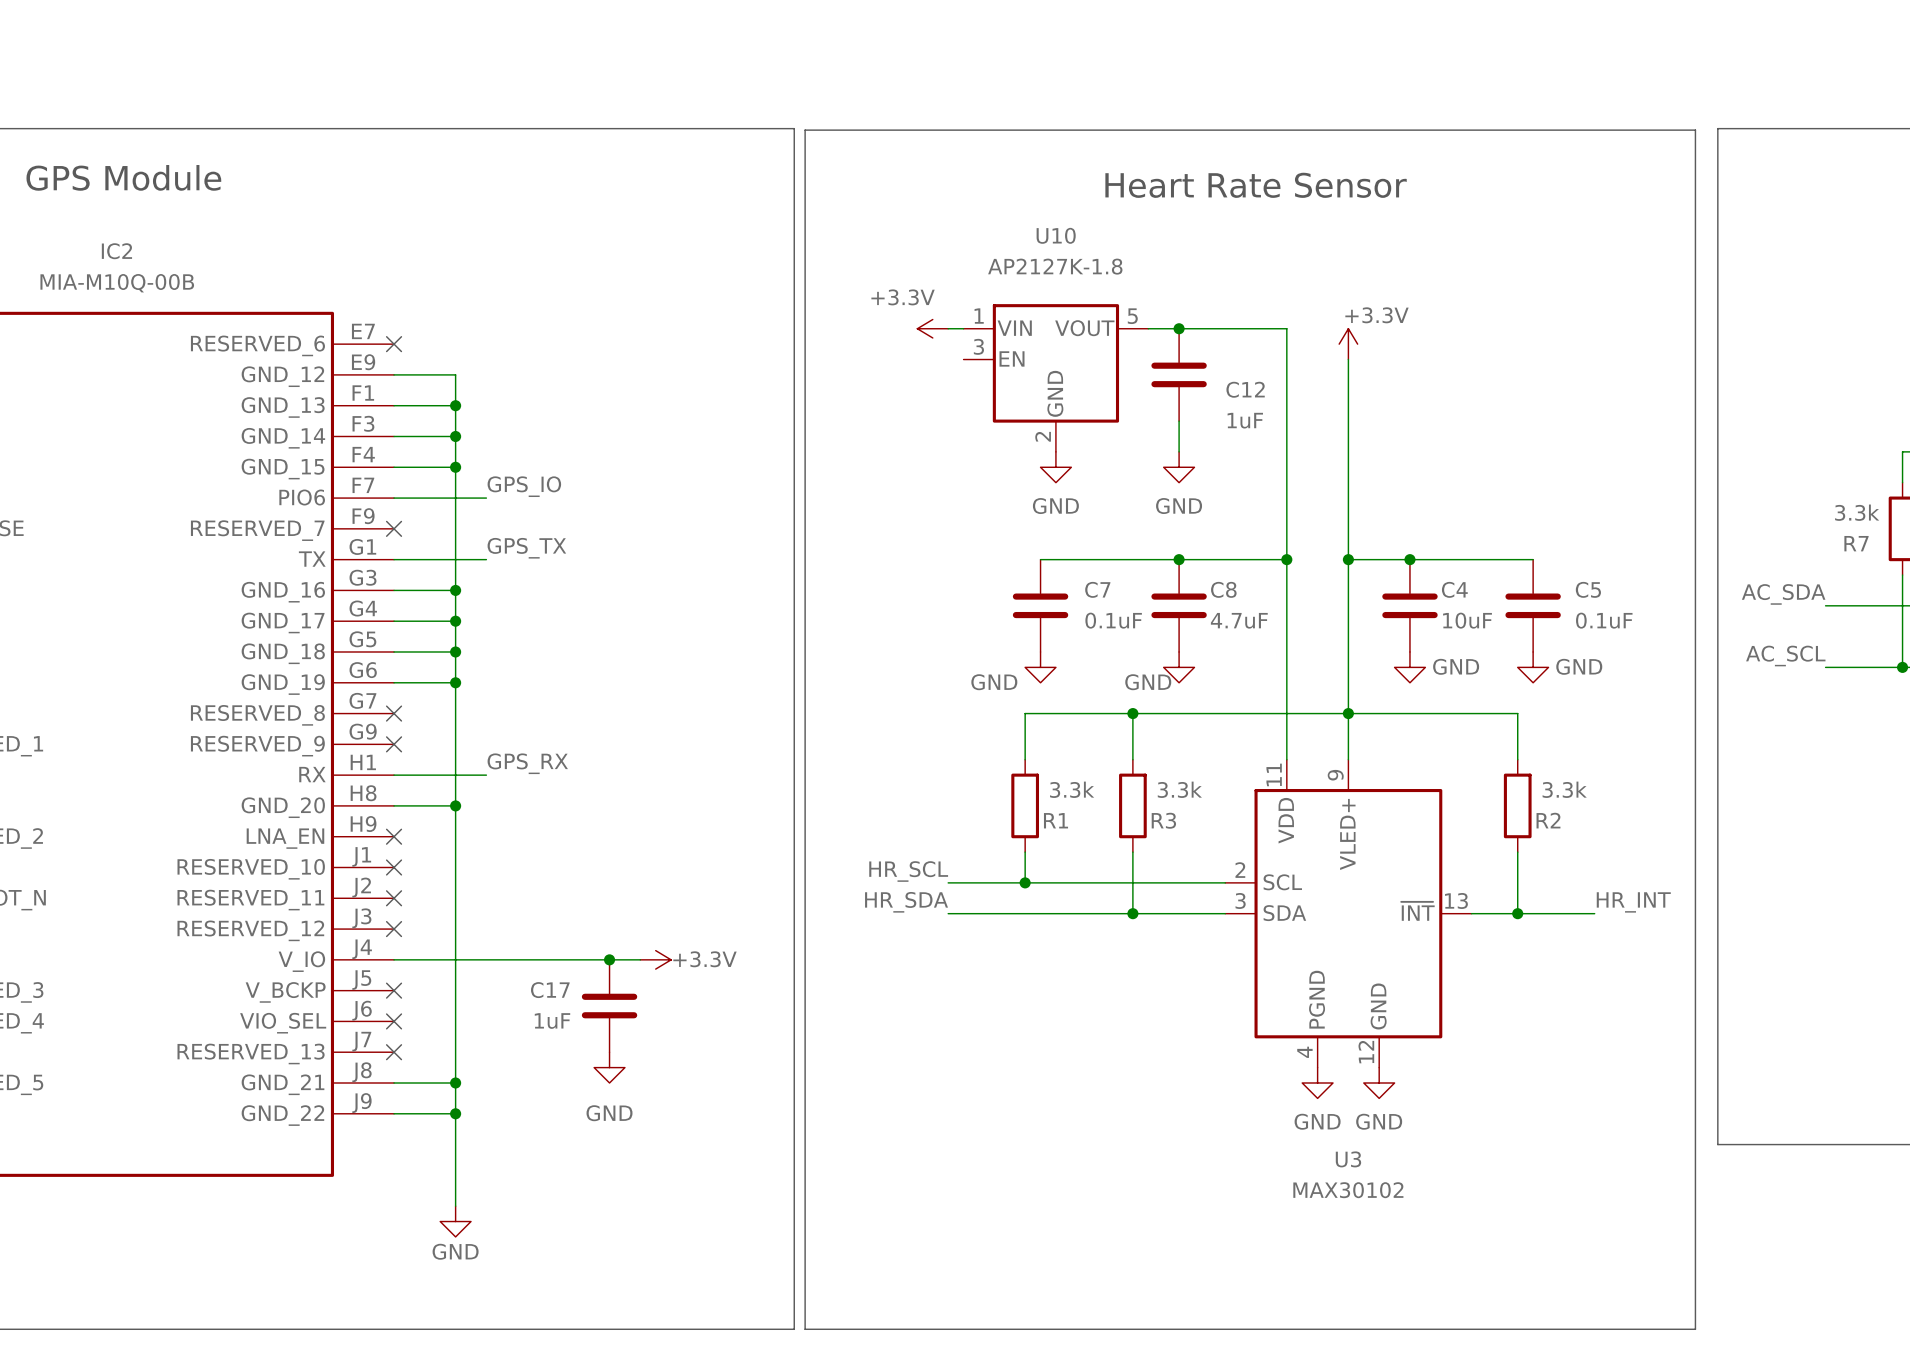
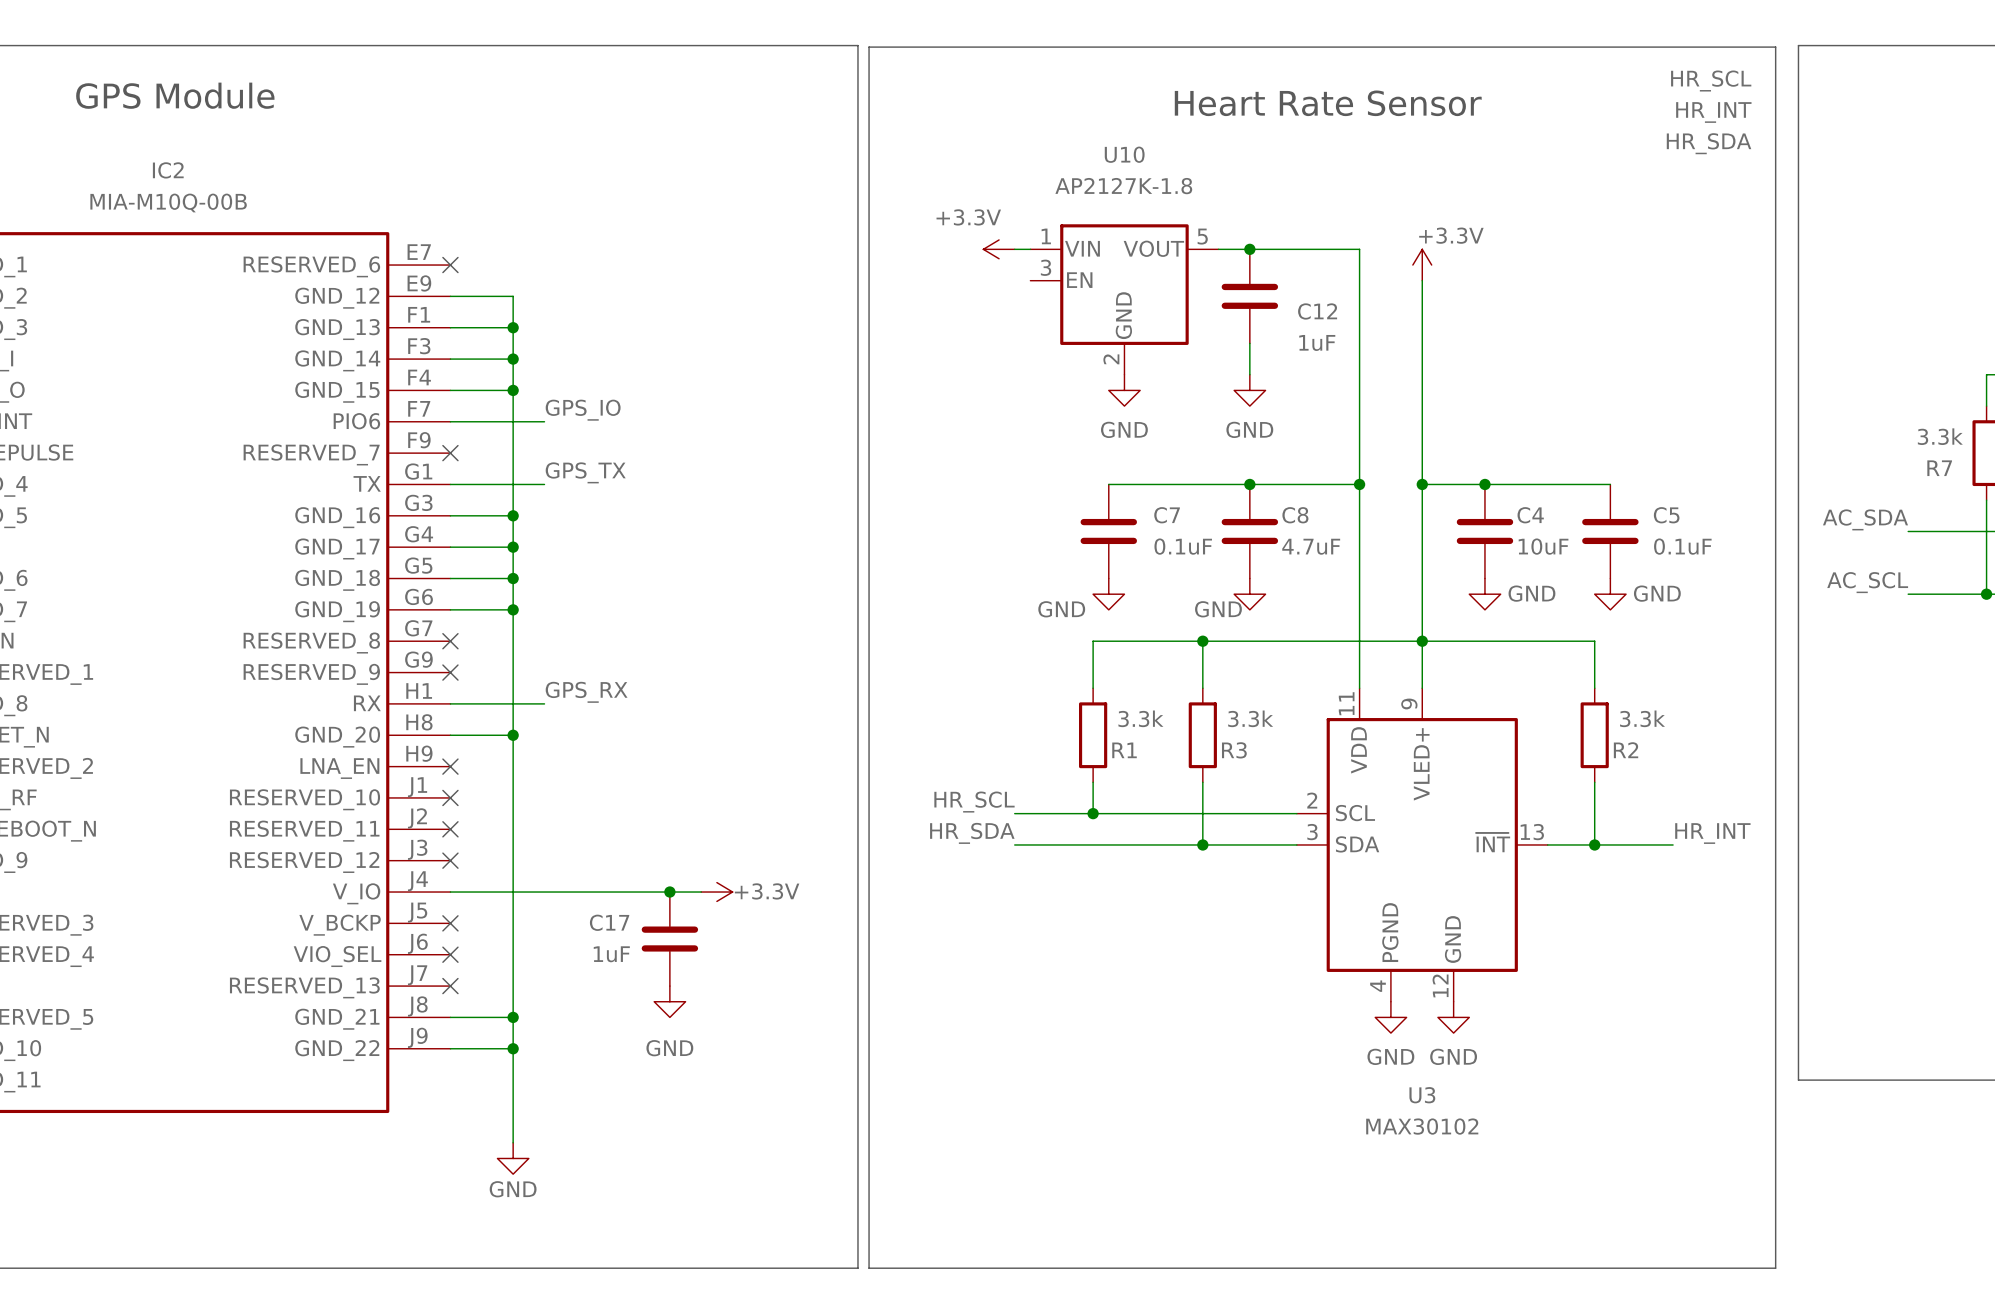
label: none -> HR_SCL (1711, 81)
label: none -> HR_INT (1713, 112)
label: none -> HR_SDA (1709, 143)

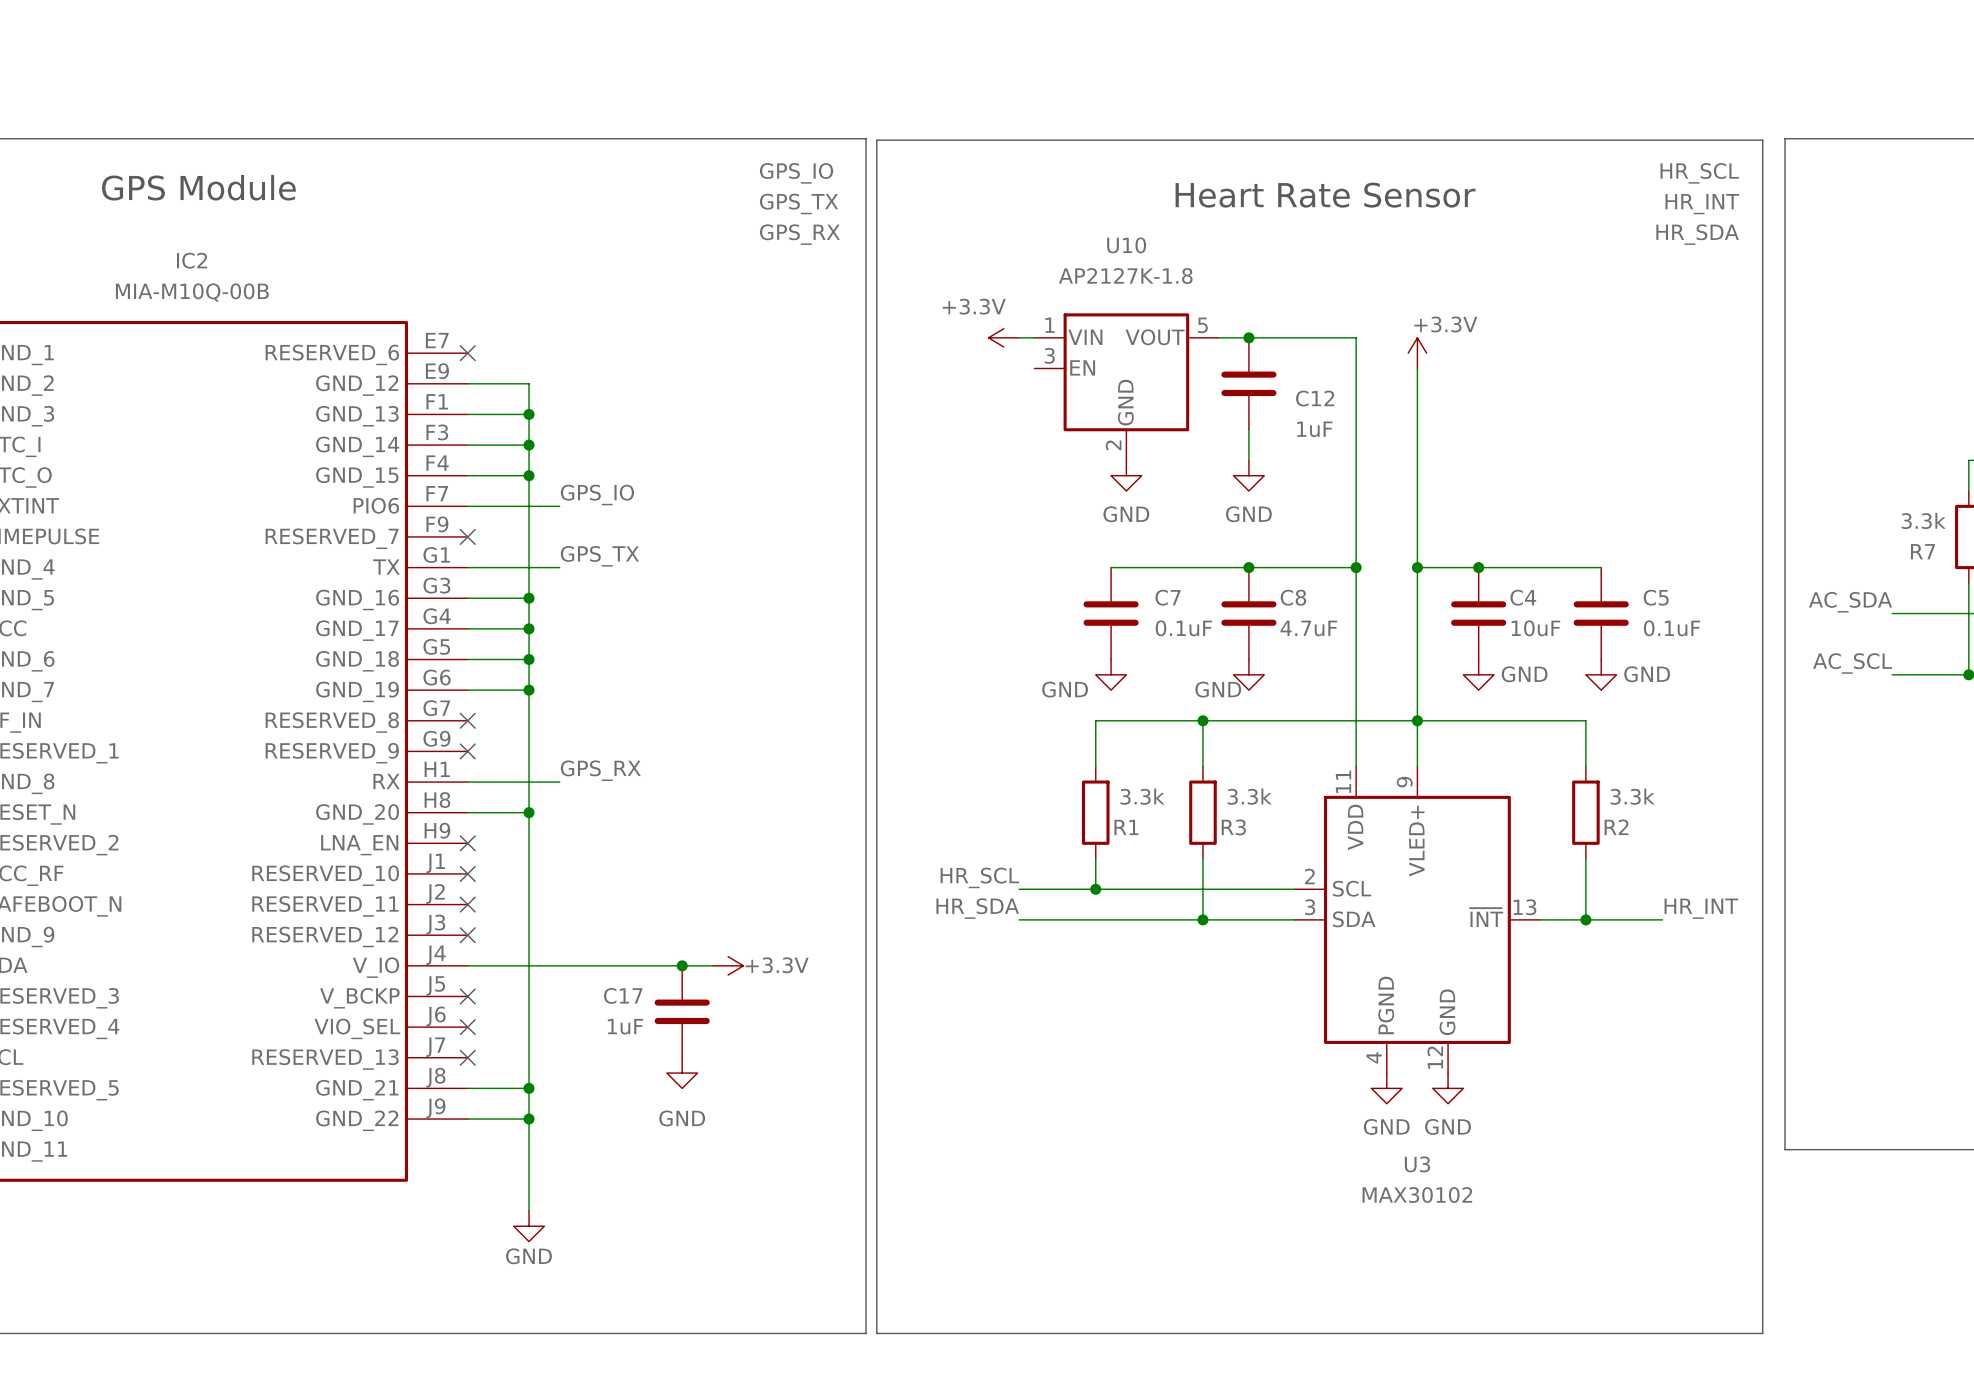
label: none -> GPS_IO (796, 173)
label: none -> GPS_TX (799, 203)
label: none -> GPS_RX (799, 234)

